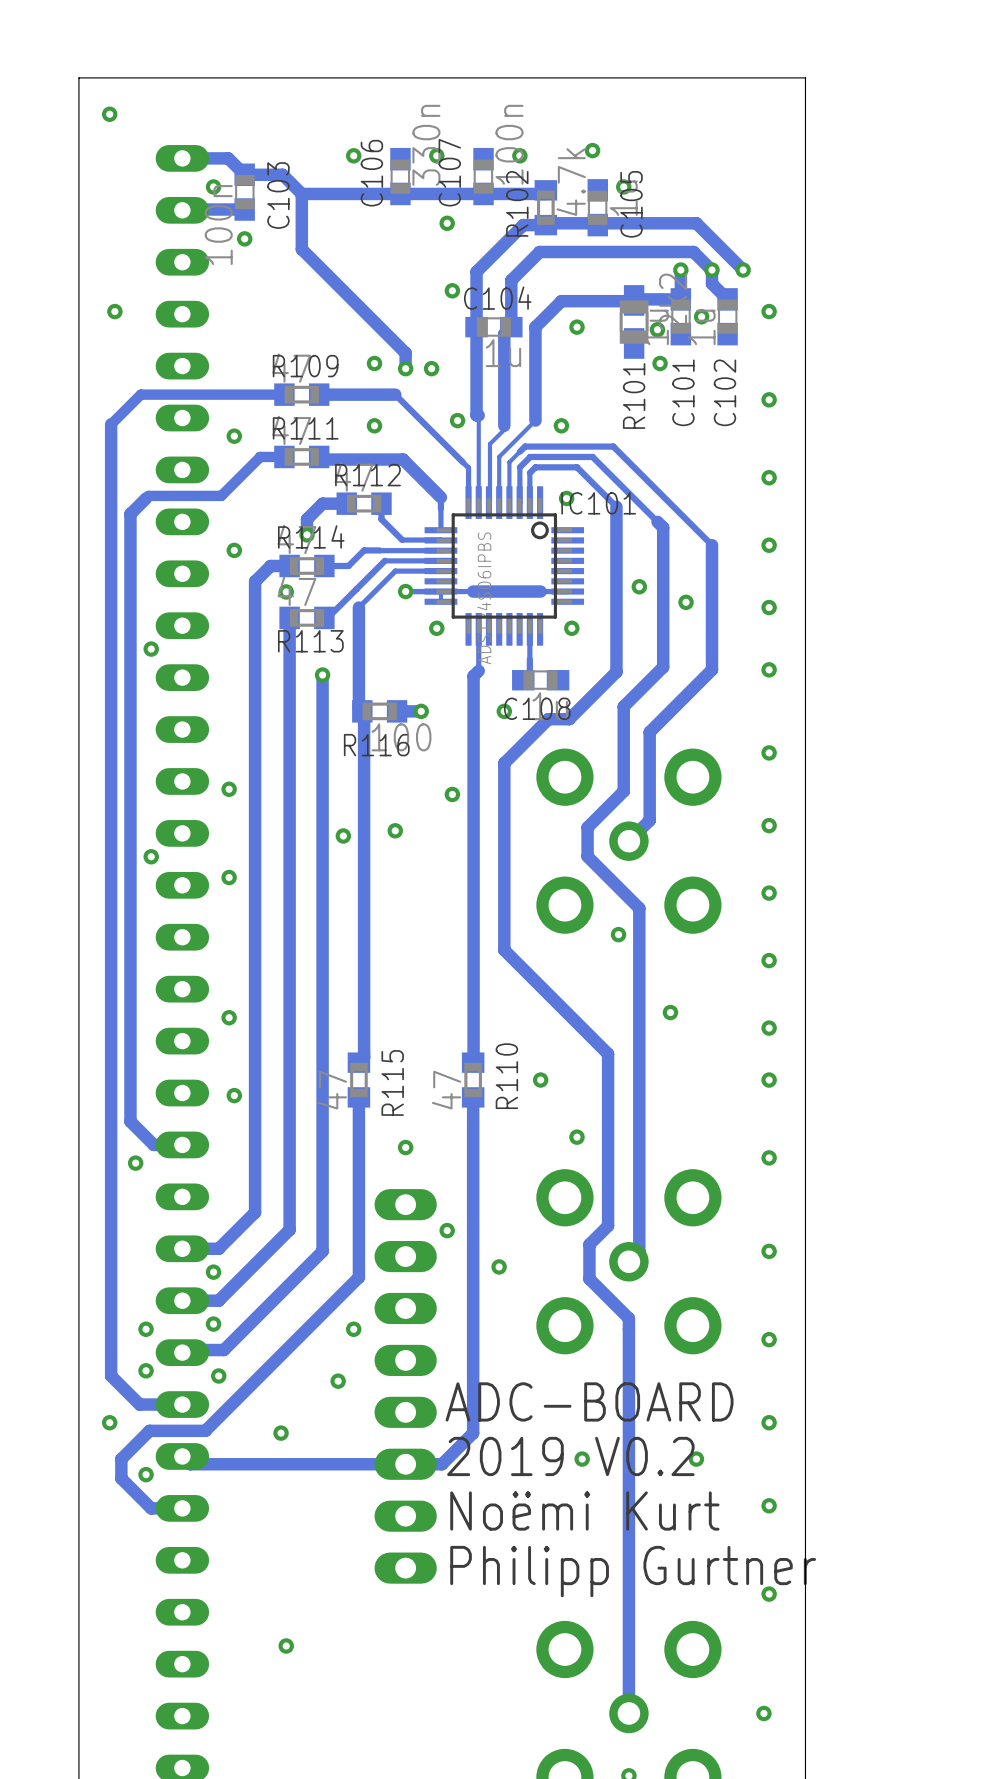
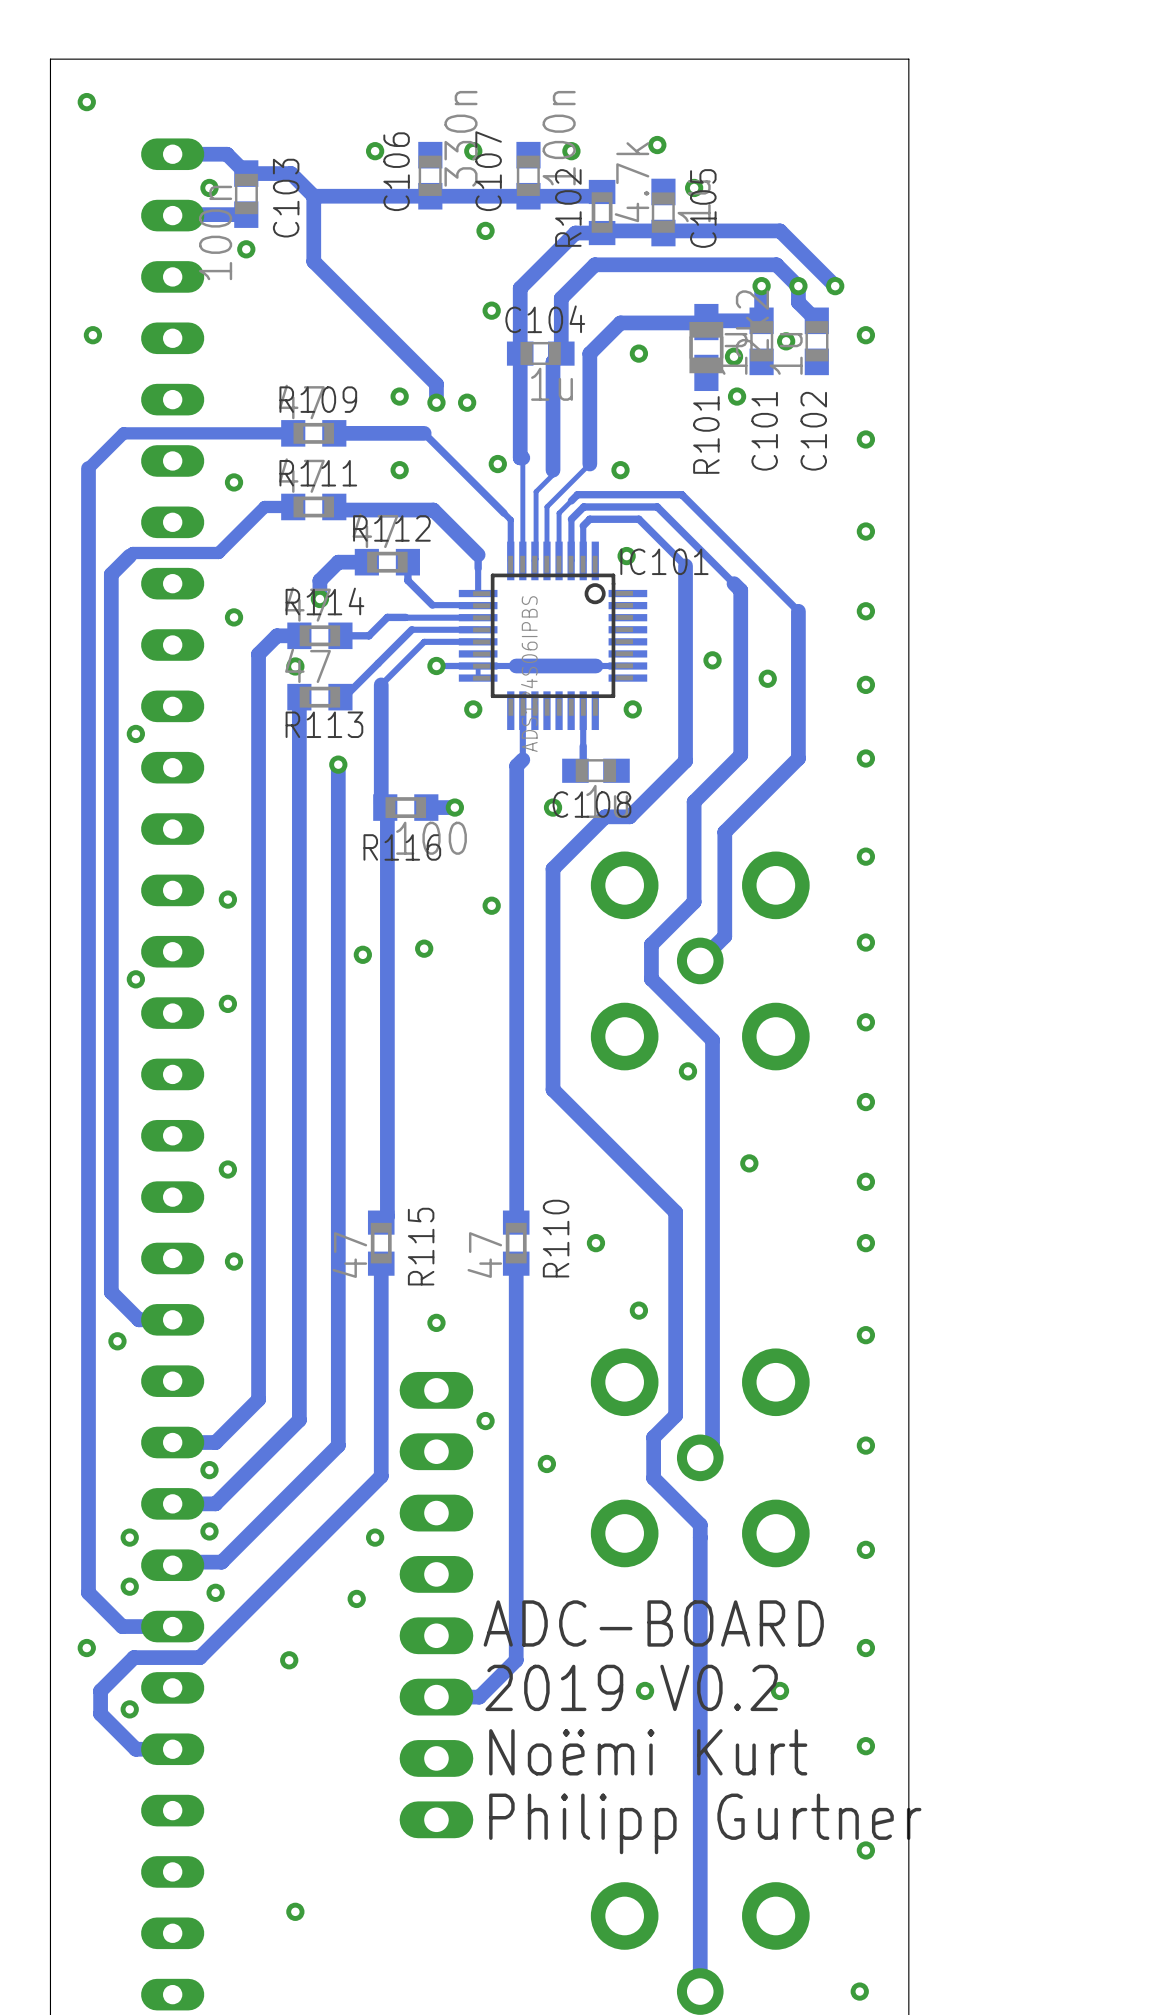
track: (182, 1456) (190, 1464) (405, 1464) -> none

